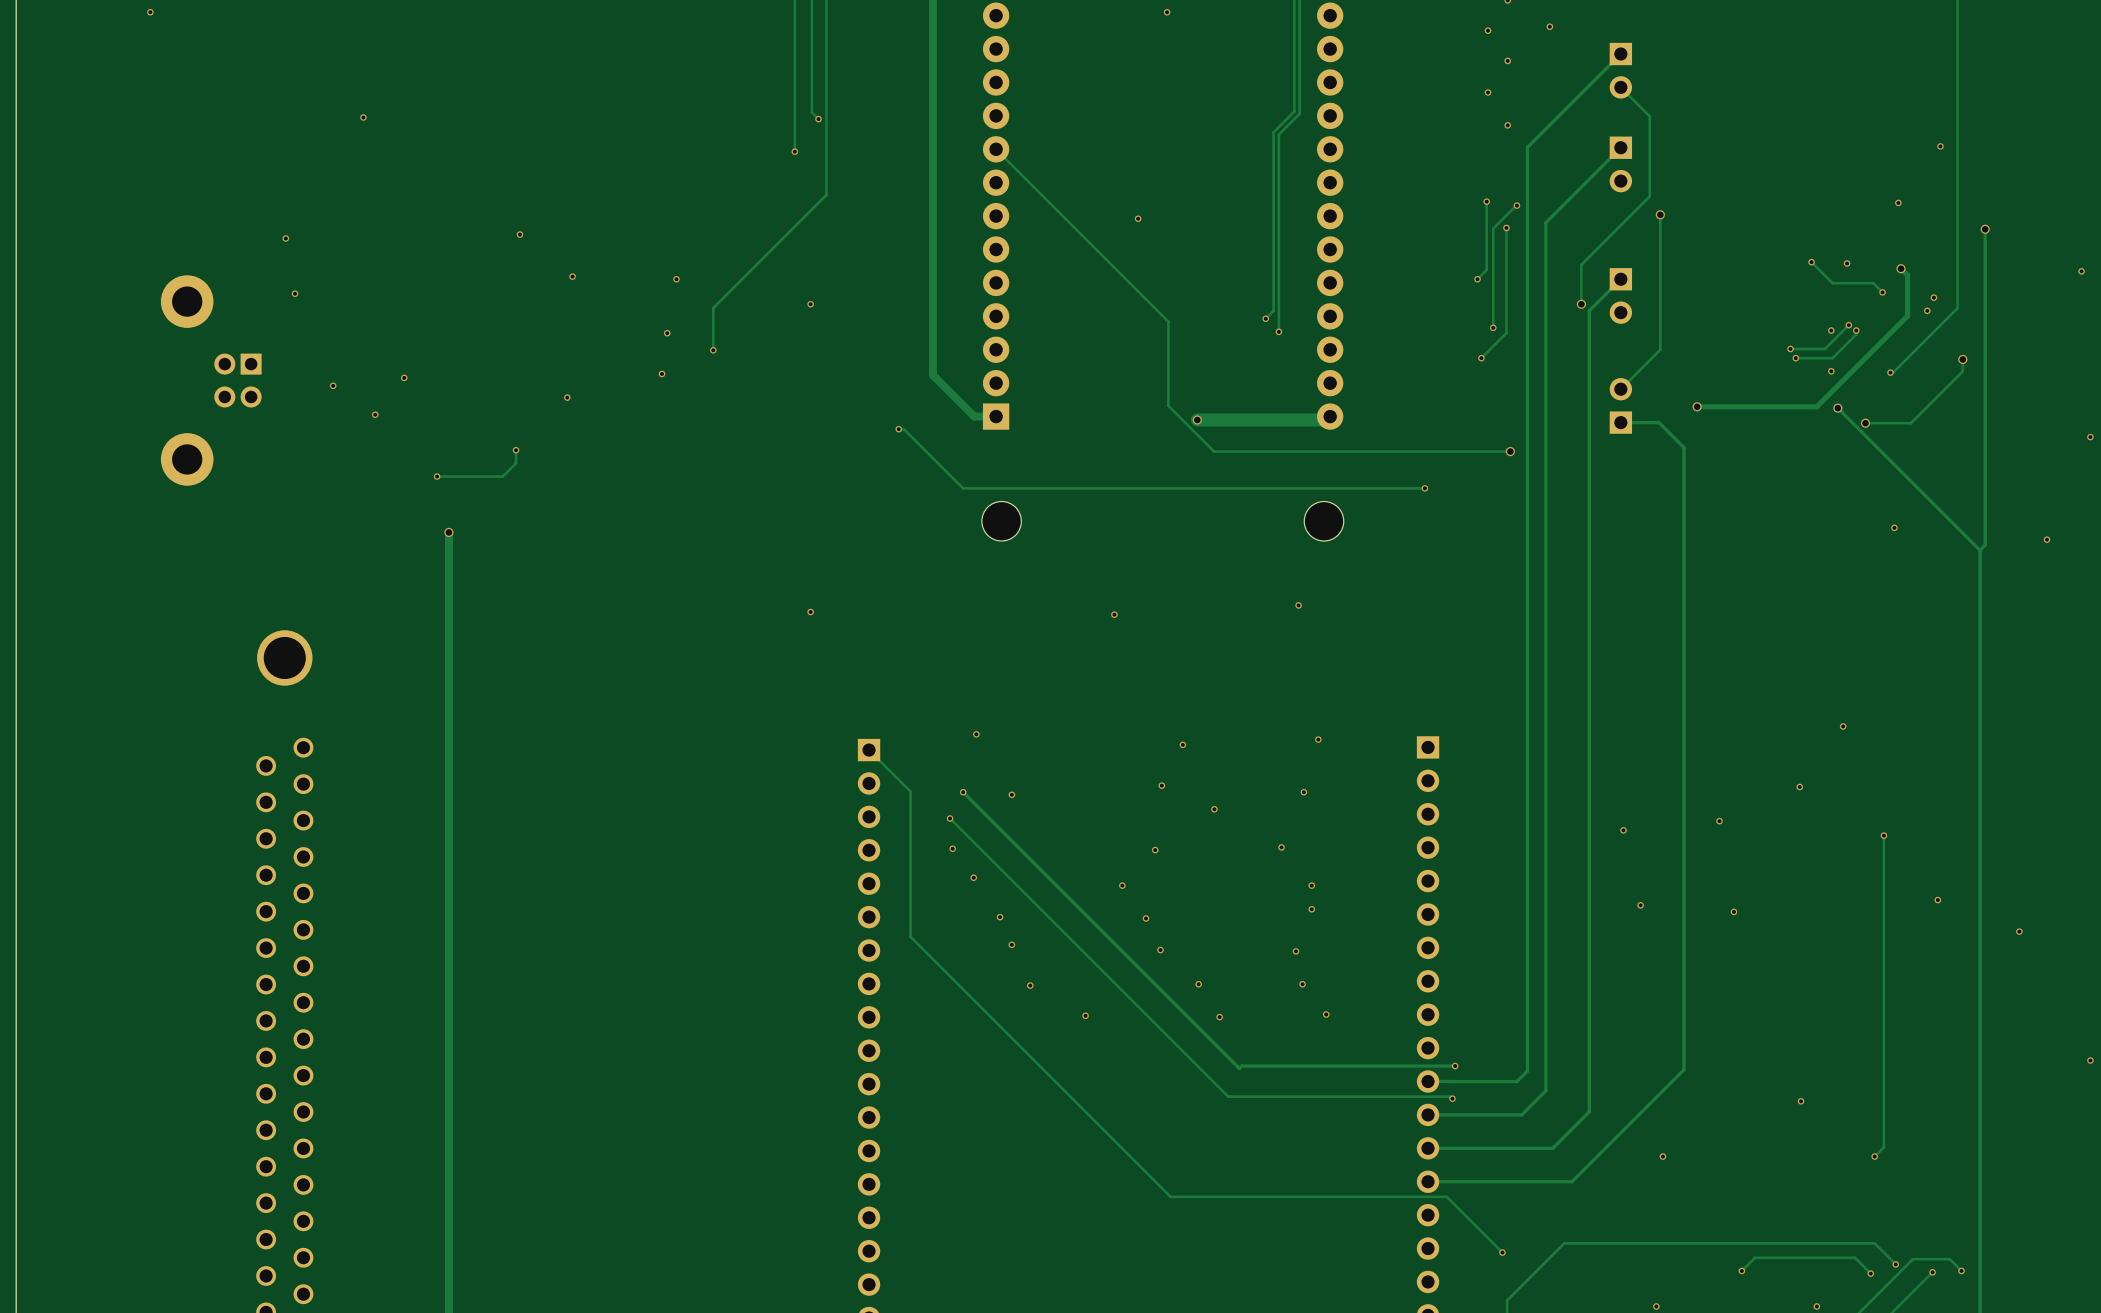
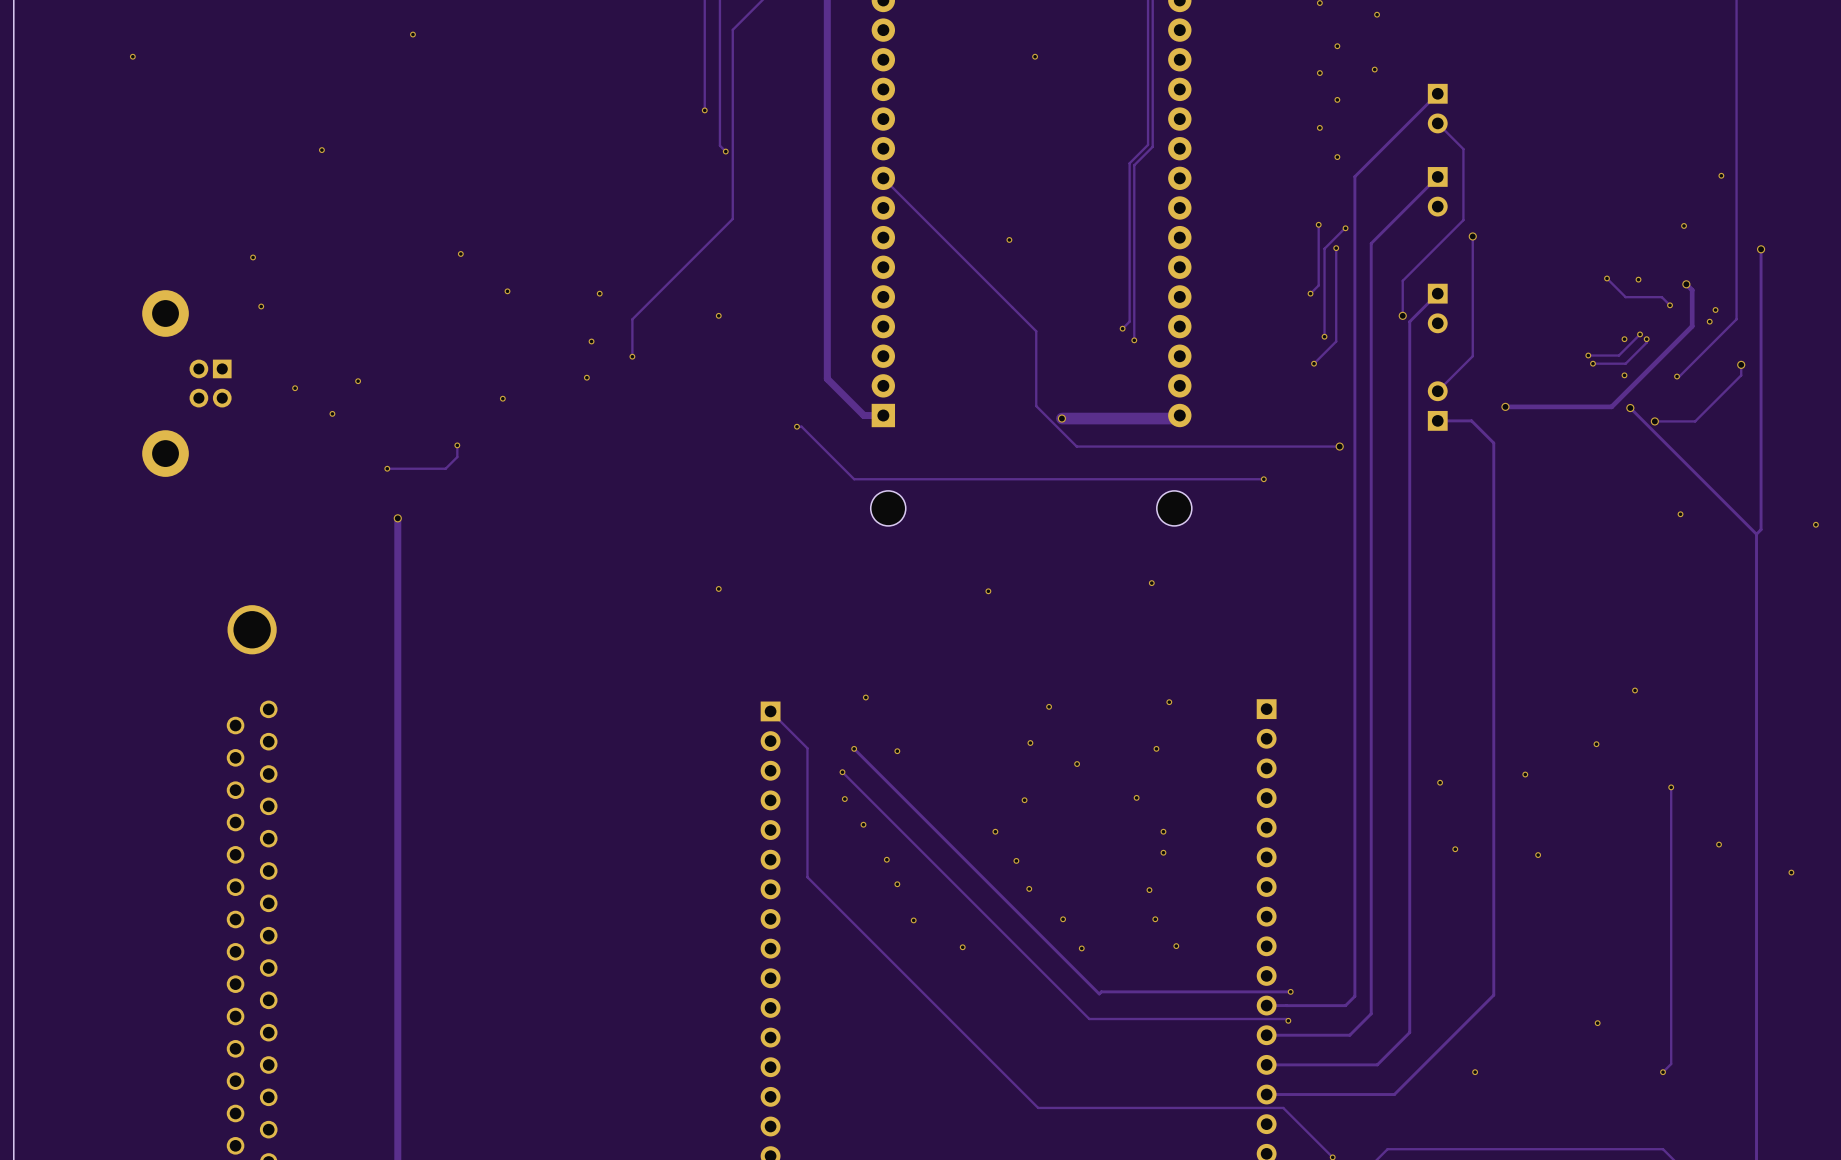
track: (794, 72) (794, 151) -> none
via position: (794, 151) -> (704, 110)

